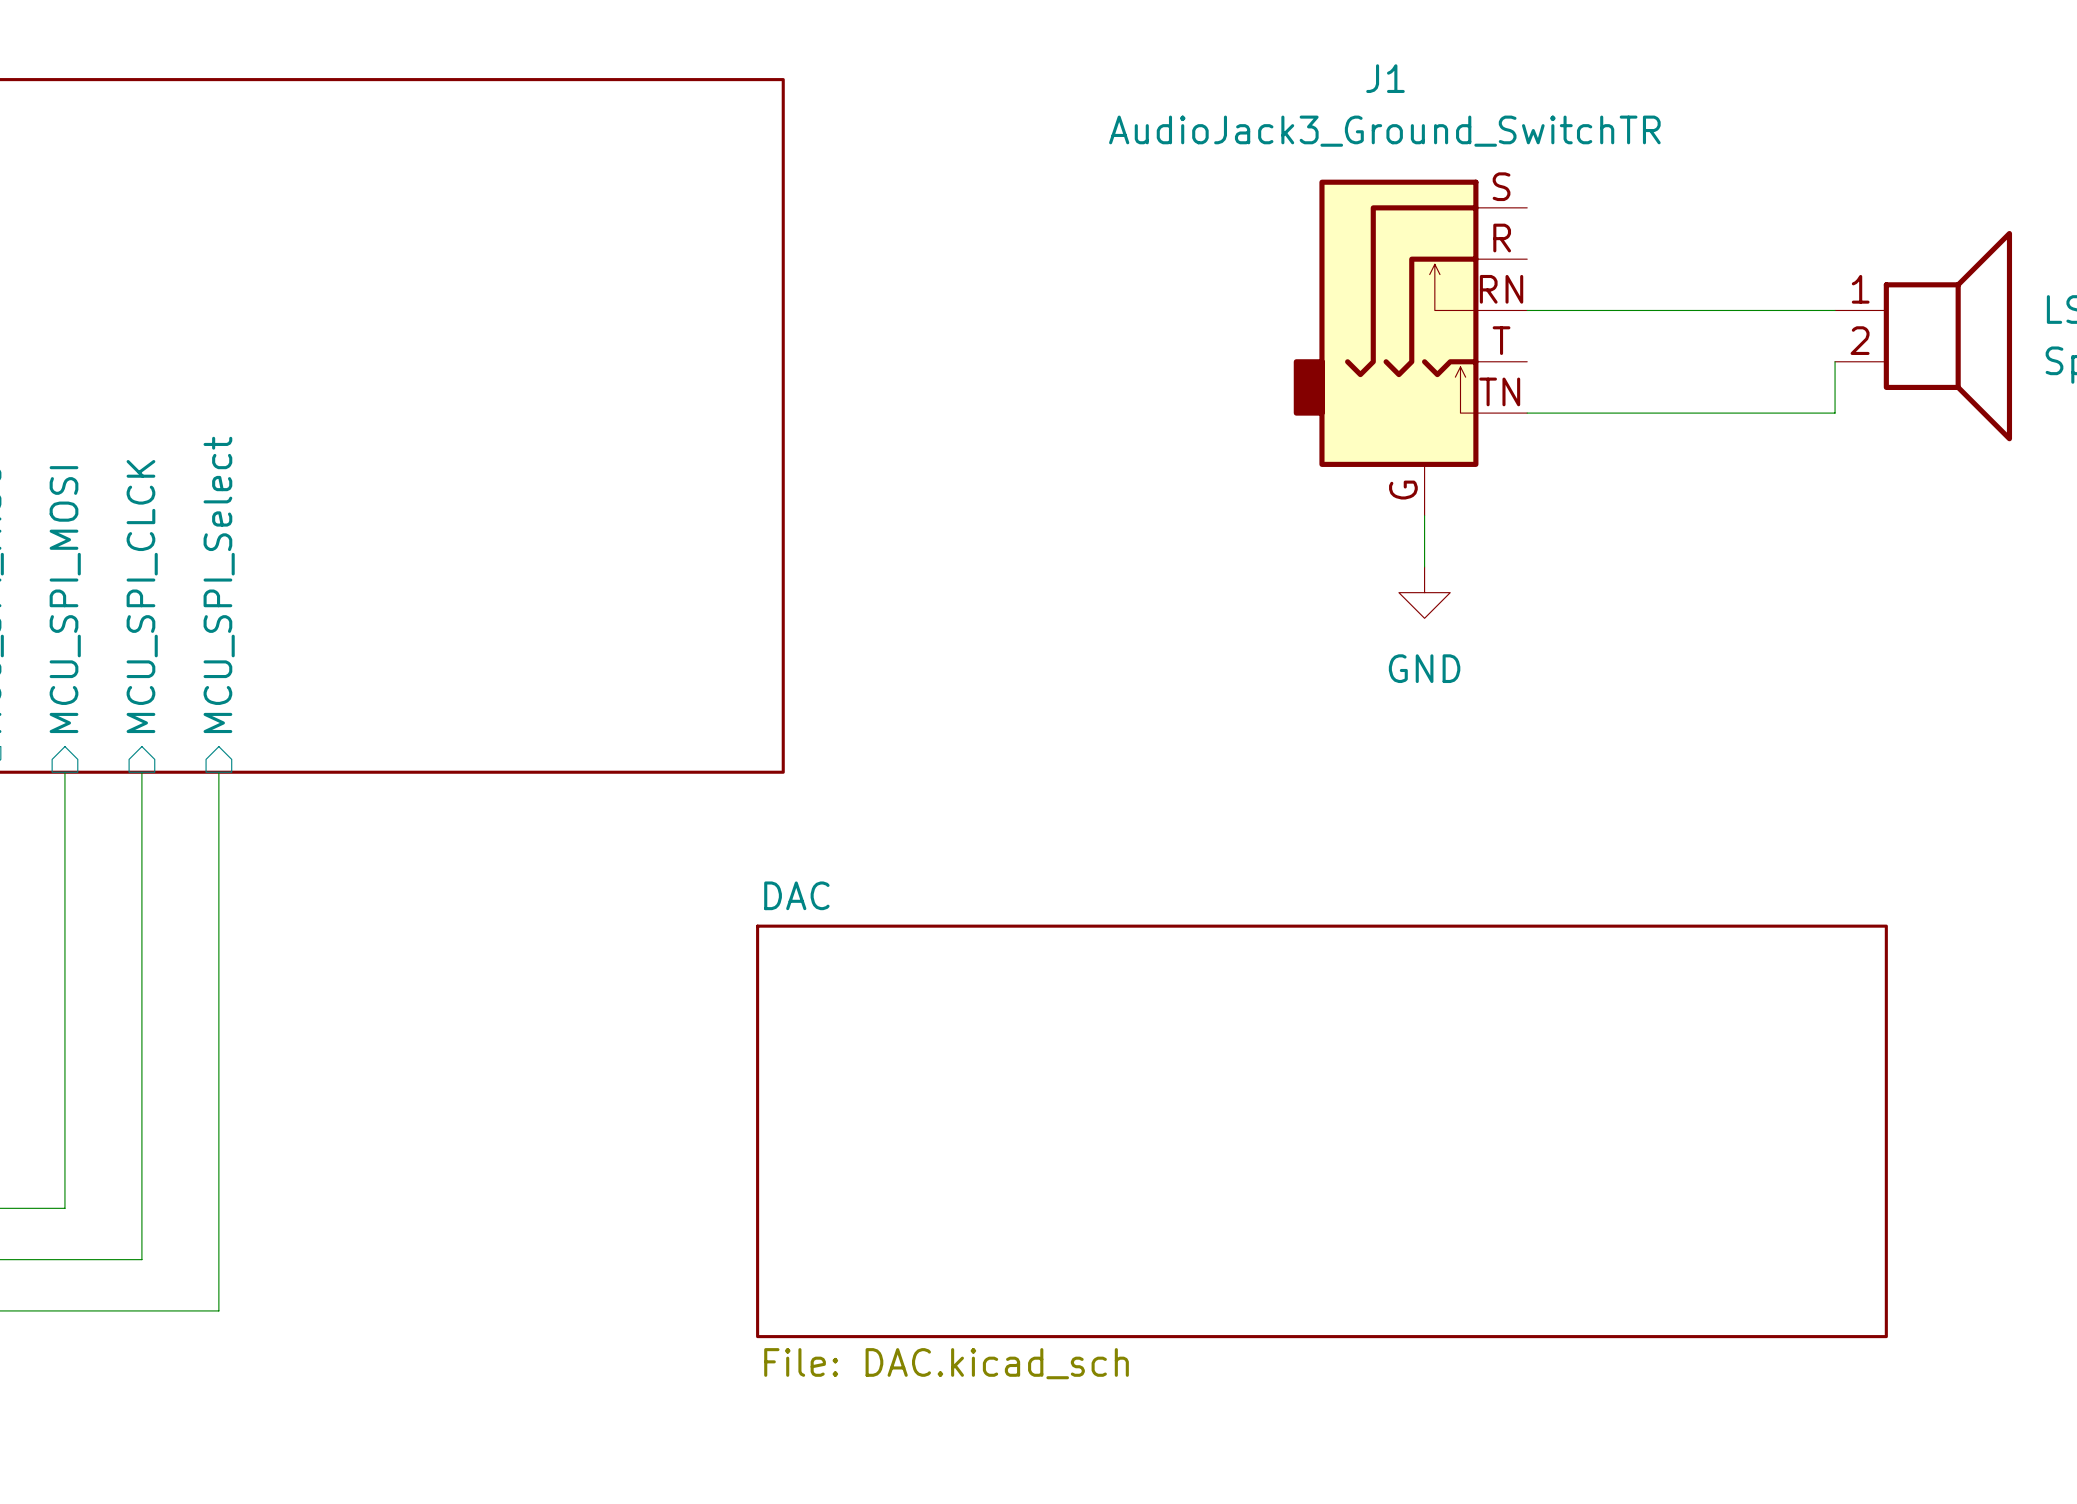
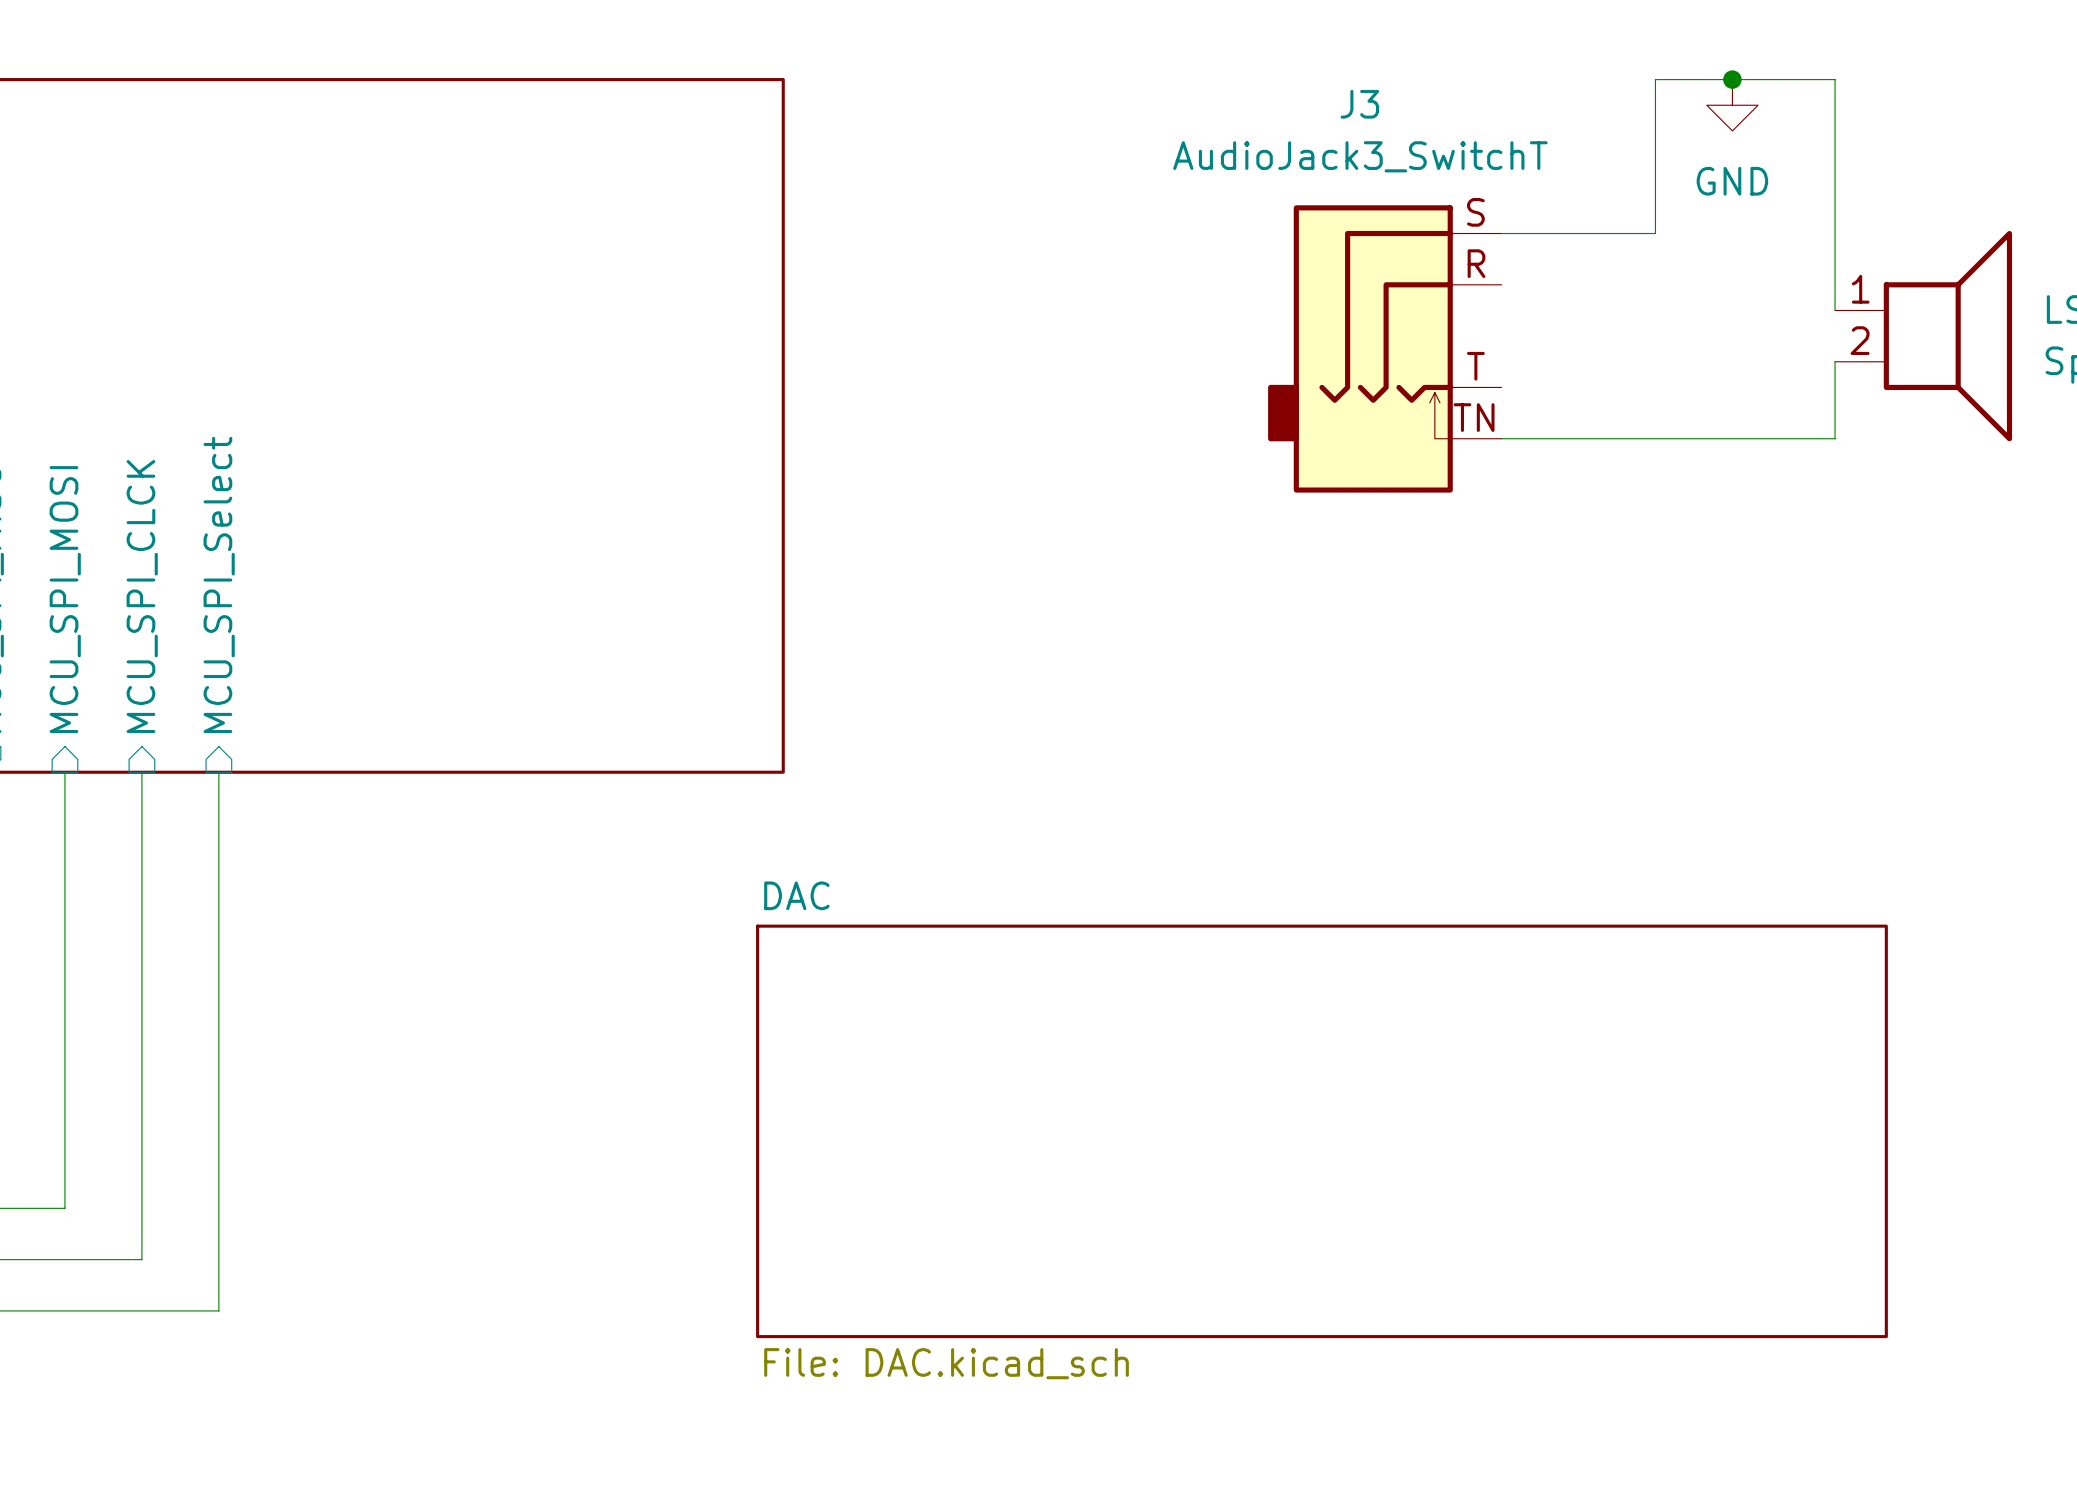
junction: none -> (1732, 79)
power symbol: none -> GND (1732, 105)
wire: (1527, 310) (1835, 310) -> (1501, 233) (1655, 233) (1655, 79) (1835, 79) (1835, 310)
J1: AudioJack3_Ground_SwitchTR (1410, 347) -> none
J3: none -> AudioJack3_SwitchT (1384, 348)
wire: (1527, 413) (1835, 413) -> (1501, 438) (1835, 438) (1835, 413)
wire: (1424, 515) (1424, 567) -> none
power symbol: GND (1424, 592) -> none

